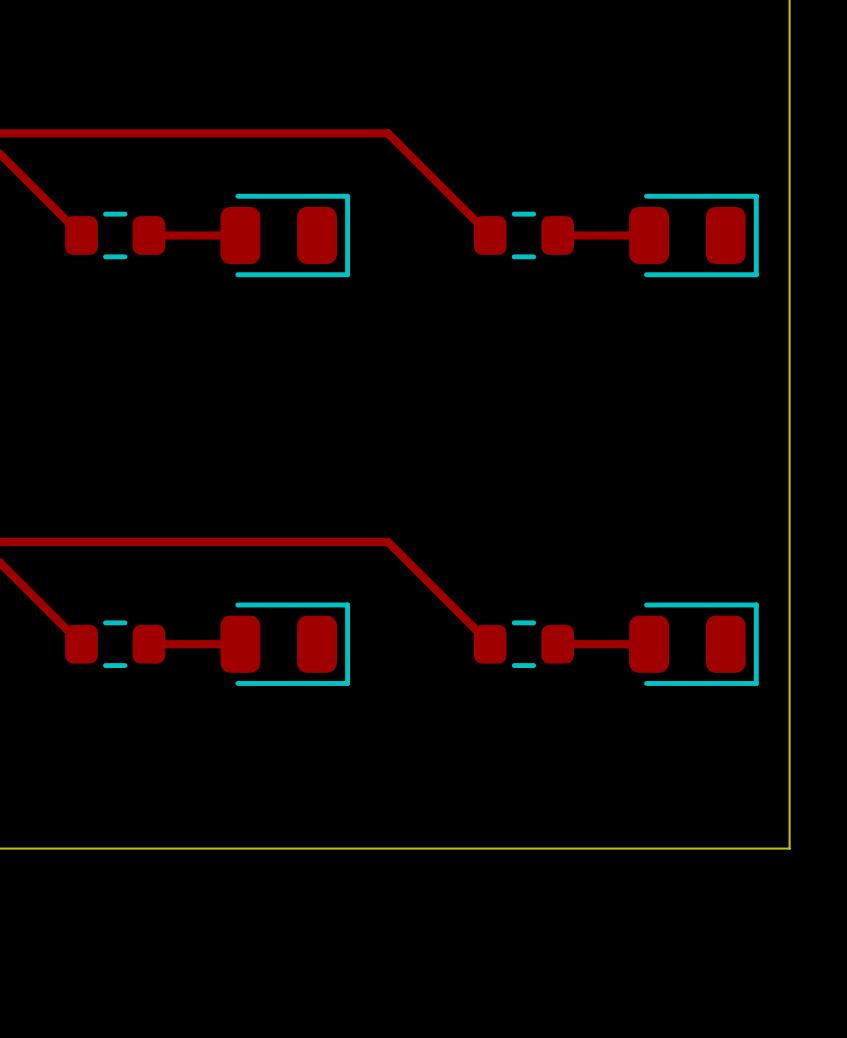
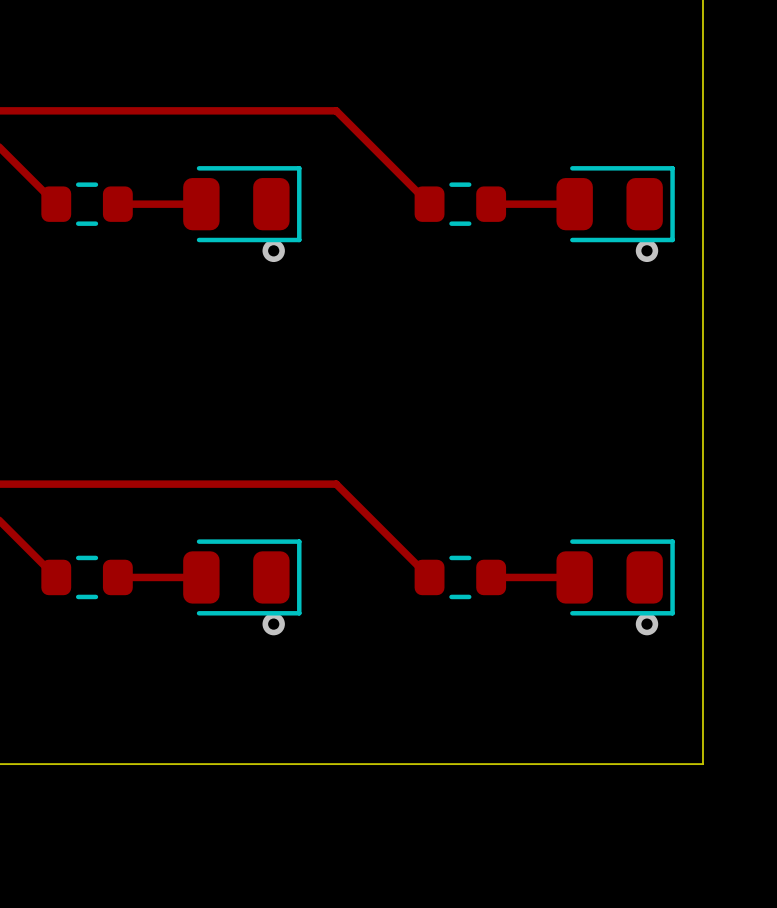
via: none -> (273, 250)
via: none -> (646, 250)
via: none -> (273, 624)
via: none -> (646, 624)

